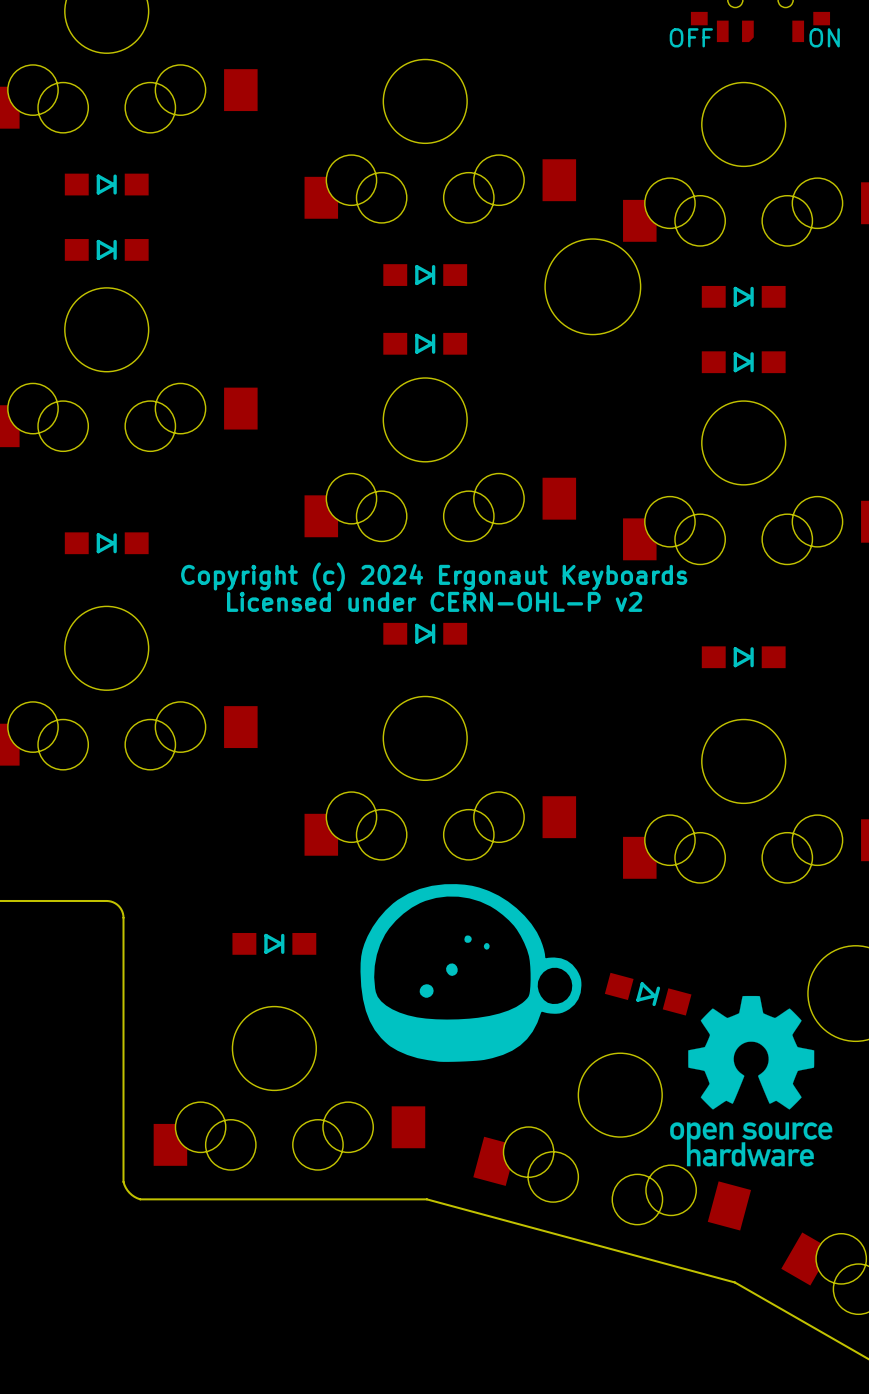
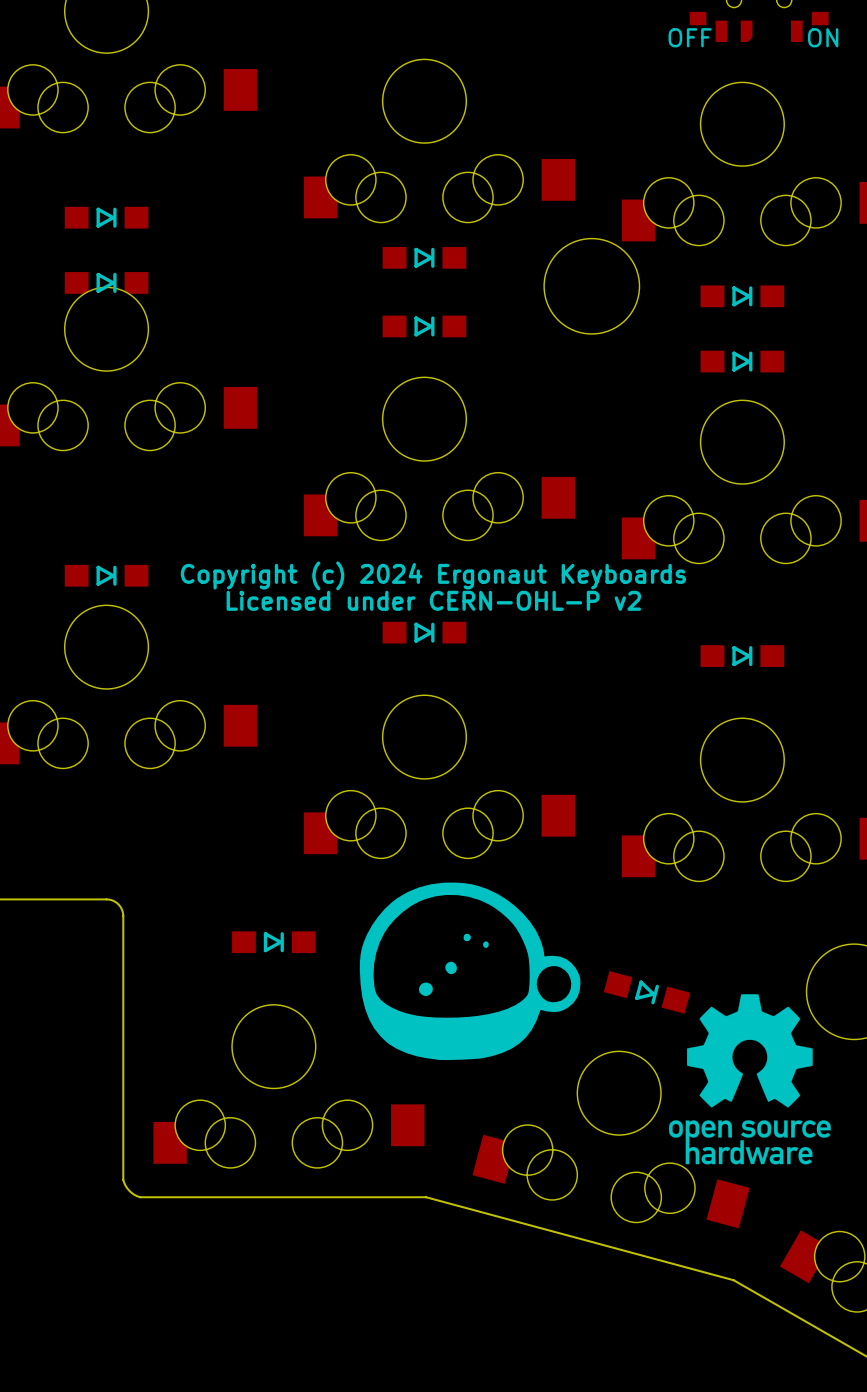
part: (106, 184) -> none
part: none -> (106, 217)
part: (106, 249) -> none
part position: (425, 275) -> (424, 257)
part: none -> (106, 282)
part position: (425, 343) -> (424, 326)
part position: (106, 543) -> (106, 575)

